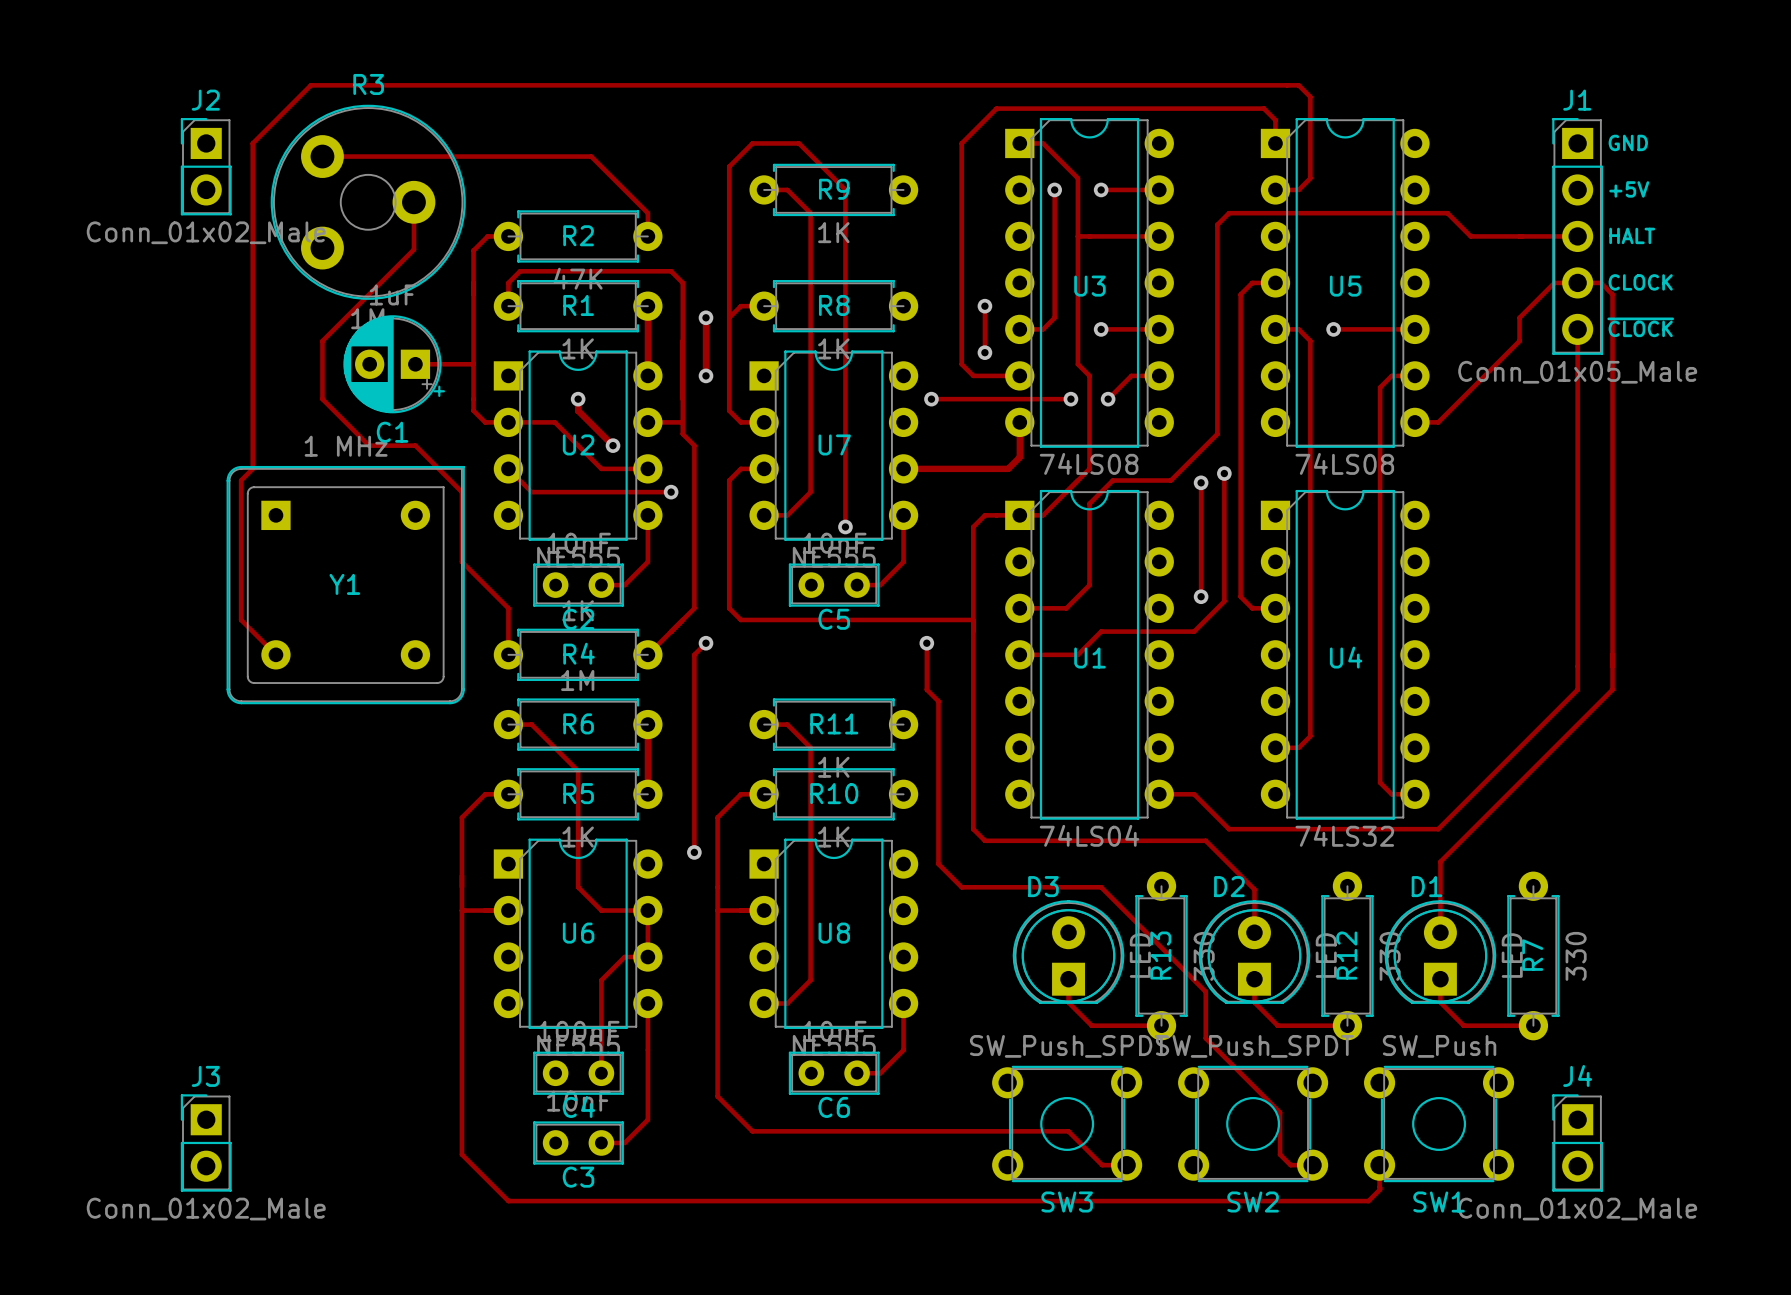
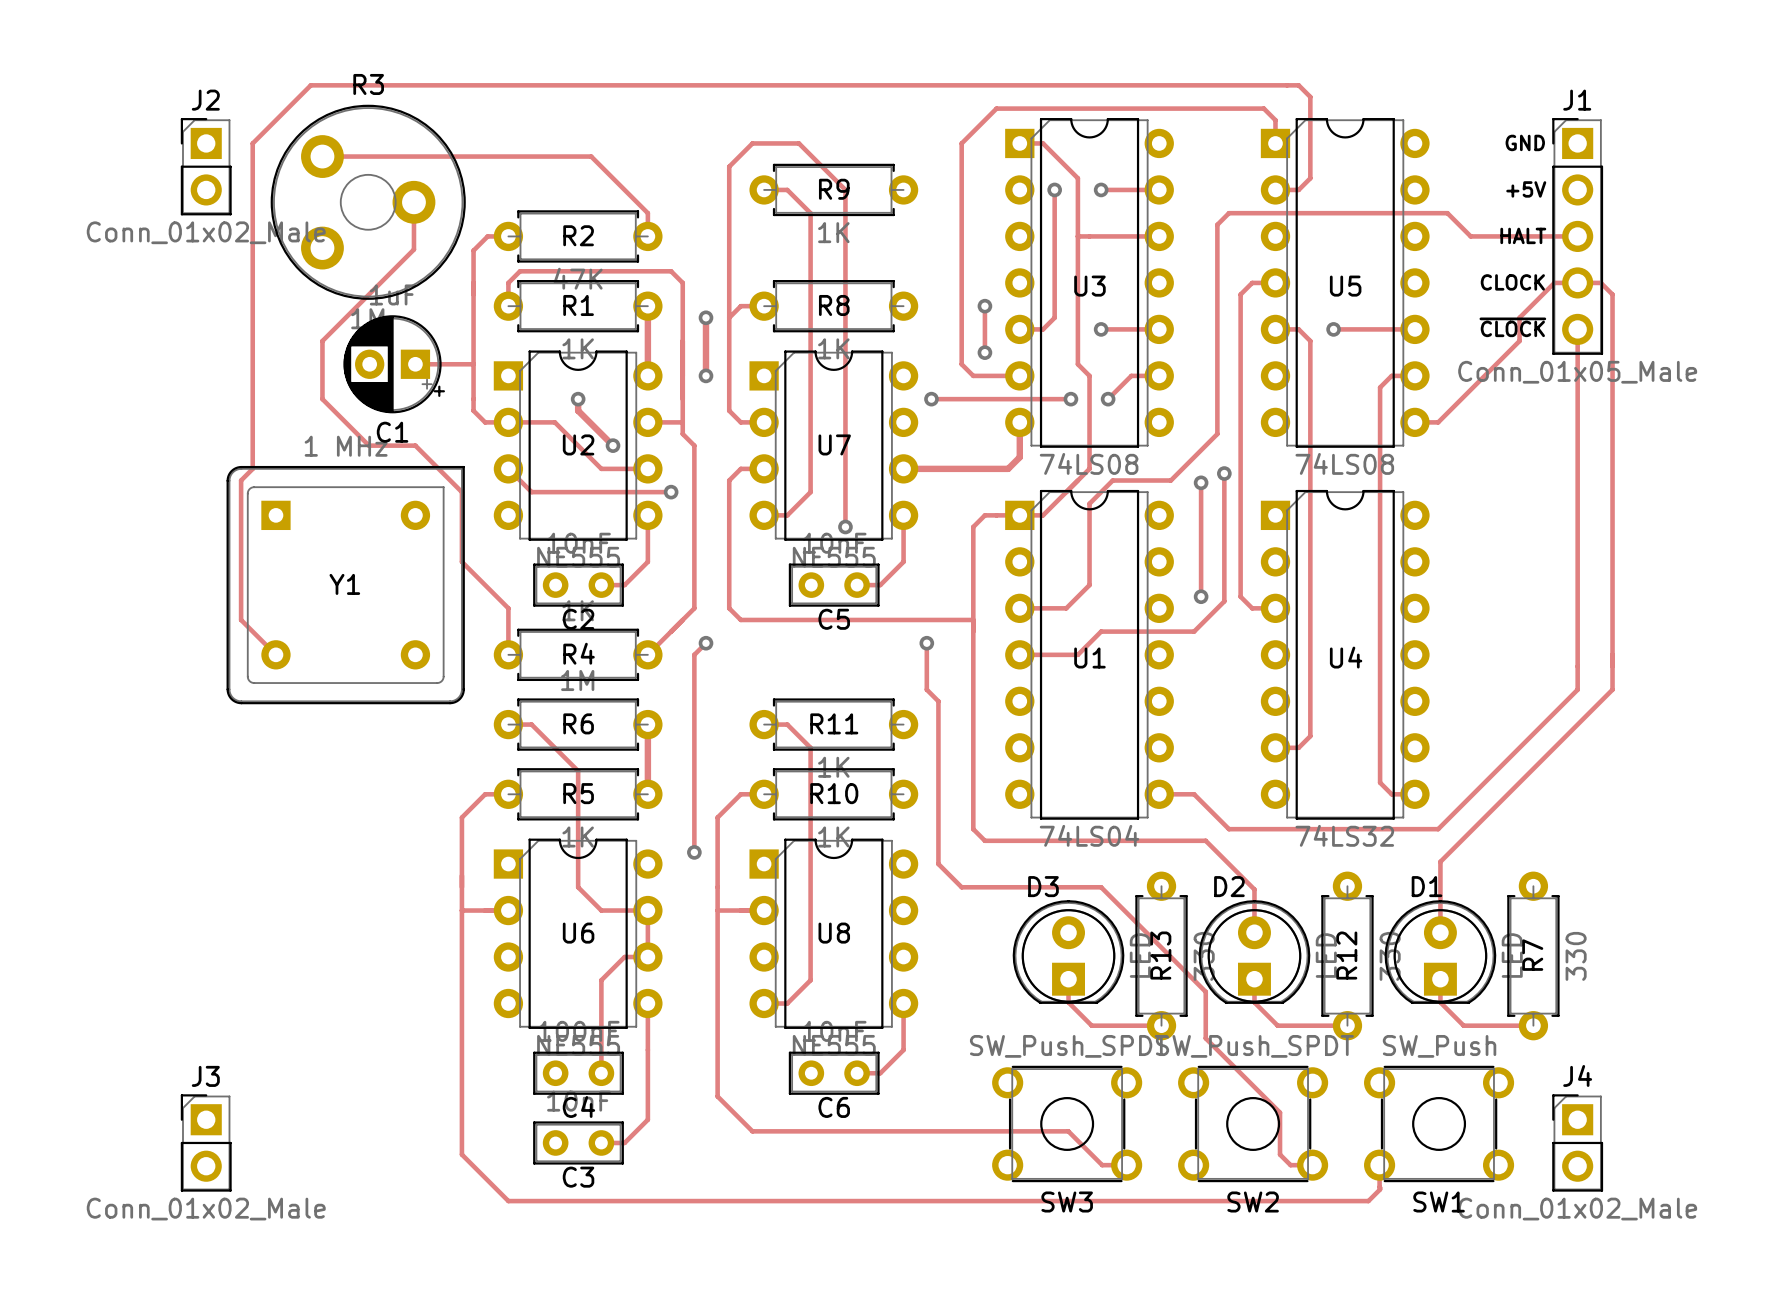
text position: GND (1628, 142) -> GND (1525, 142)
text position: +5V (1629, 189) -> +5V (1526, 189)
text position: HALT (1632, 235) -> HALT (1523, 235)
text position: CLOCK (1640, 282) -> CLOCK (1512, 282)
text position: ~{CLOCK} (1640, 327) -> ~{CLOCK} (1512, 327)

